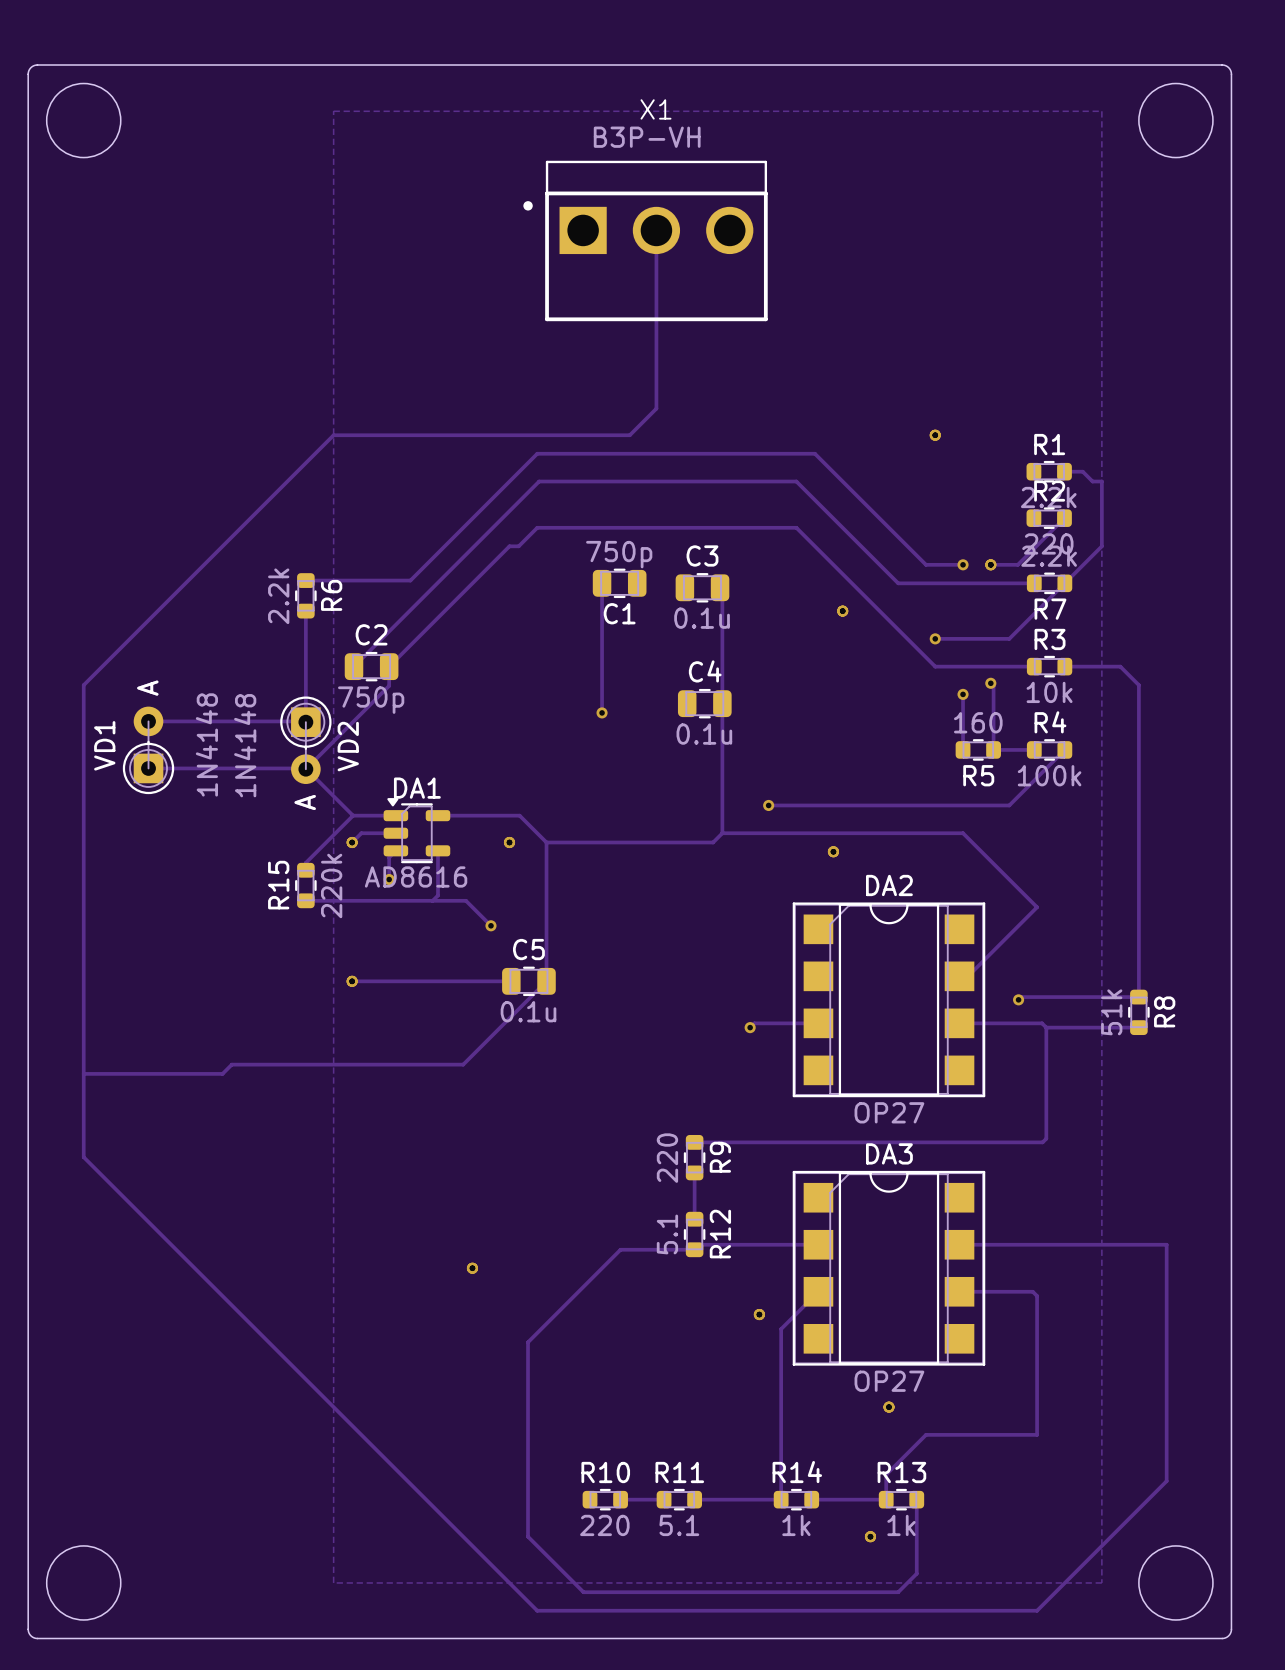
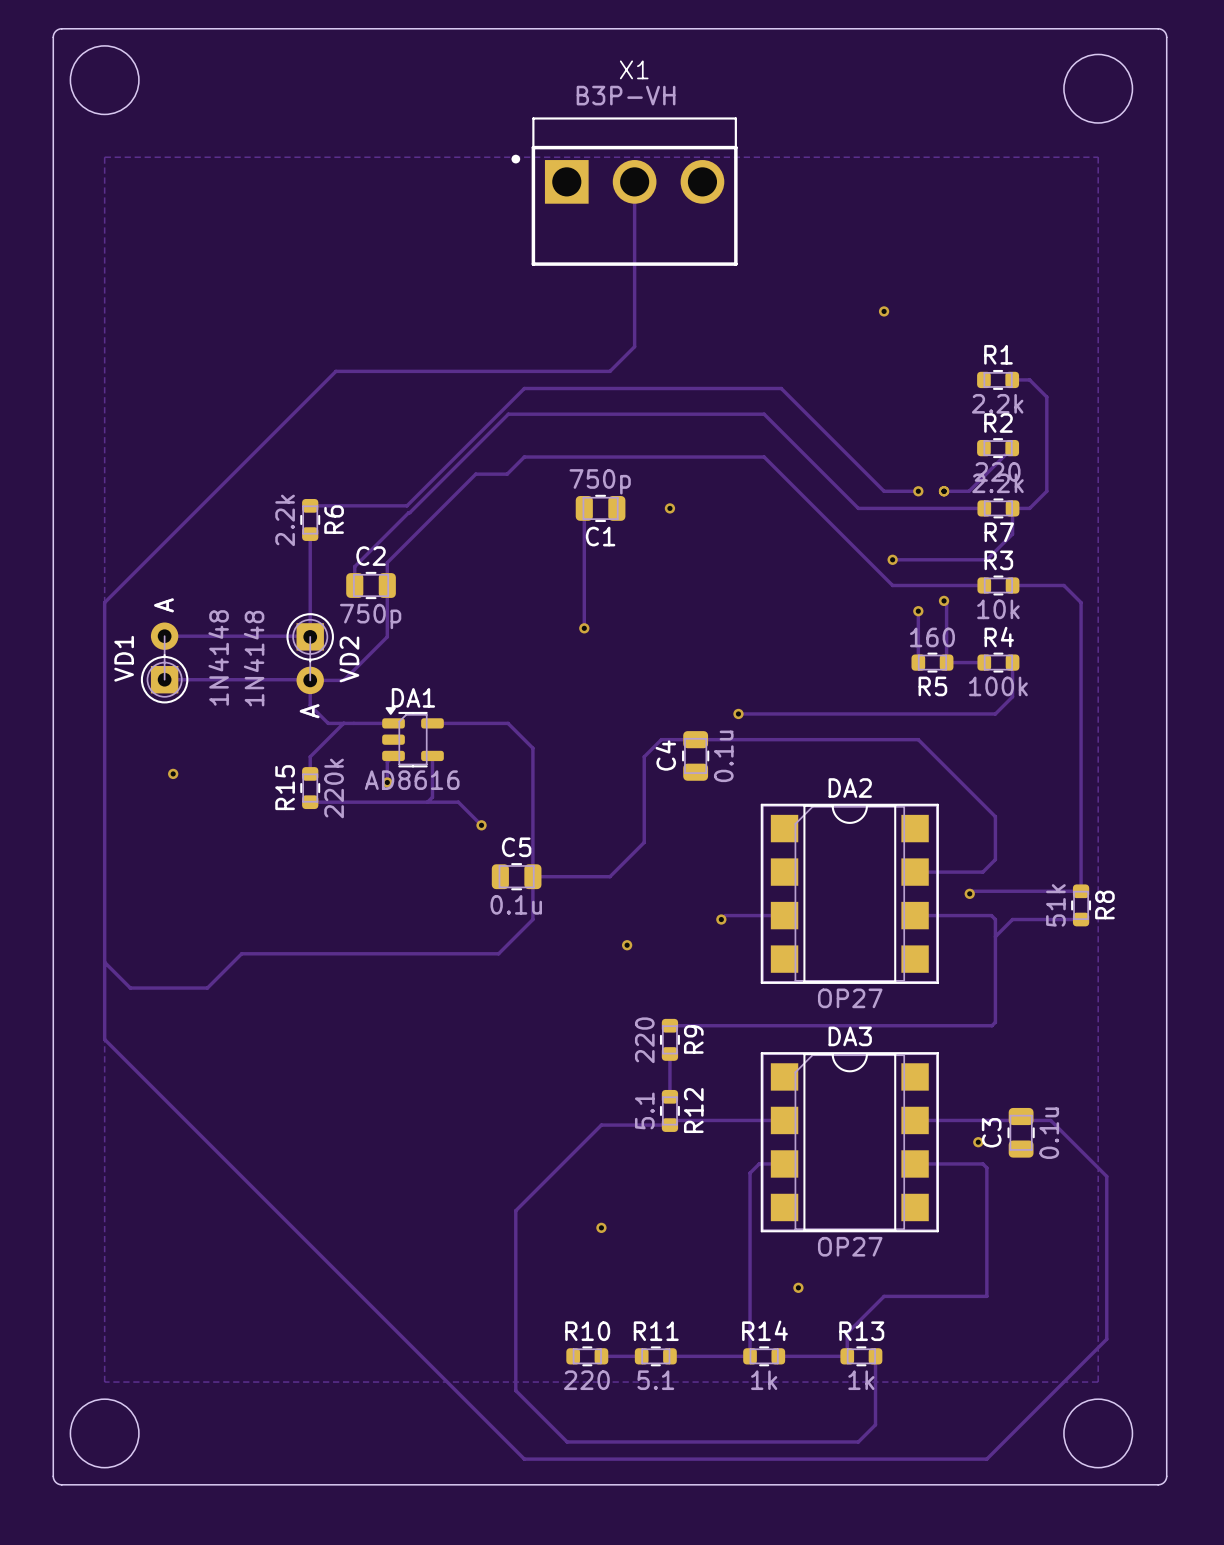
zone outline: (333, 111) (1101, 111) (1101, 1582) (333, 1582) (333, 111) -> (104, 157) (104, 1382) (1098, 1382) (1098, 157) (104, 157)
round board edge position: (1175, 120) -> (1098, 88)
via position: (935, 435) -> (884, 311)
R1 position: (1049, 471) -> (998, 379)
track: (1064, 471) (1082, 471) (1092, 481) (1101, 481) -> (1012, 379) (1029, 379) (1046, 397) (1046, 414)
track: (539, 481) (354, 666) -> (526, 414) (508, 414) (408, 512) (354, 566) (354, 585)
track: (509, 546) (389, 666) -> (498, 474) (475, 474) (387, 562) (387, 585)
track: (1101, 546) (1009, 638) -> (1046, 474) (1046, 491) (1029, 508) (1012, 508) (1012, 534) (986, 559) (961, 559)
C3 name position: C3 (702, 555) -> C3 (991, 1132)
via: none -> (669, 508)
C3 rotation: 0° (702, 587) -> 90° clockwise (1021, 1132)
C3 position: (702, 587) -> (1021, 1132)
track: (720, 587) (722, 590) (722, 833) (713, 842) (546, 842) -> none
via: (842, 611) -> none
C3 value position: 0.1u (702, 618) -> 0.1u (1049, 1133)
C4 name position: C4 (705, 671) -> C4 (665, 755)
track: (389, 685) (305, 769) -> (387, 603) (387, 636) (343, 680) (310, 680)
C4 rotation: 0° (704, 703) -> 90° clockwise (695, 755)
C4 position: (704, 703) -> (695, 755)
C4 value position: 0.1u (704, 734) -> 0.1u (723, 756)
track: (1064, 749) (1009, 805) -> (1012, 662) (1012, 696) (995, 713) (961, 713)
track: none -> (310, 680) (310, 705) (328, 723) (353, 723)
track: (306, 769) (353, 815) (305, 862) -> (343, 723) (310, 756) (310, 767)
track: (395, 833) (361, 833) (352, 842) -> none
via: (352, 842) -> none
via: (509, 842) -> none
via: (833, 851) -> none
via: none -> (173, 773)
track: (1037, 907) (968, 976) -> (986, 808) (995, 816) (995, 859) (982, 872) (922, 872)
track: (352, 981) (511, 981) -> none
via: (352, 981) -> none
track: (546, 981) (463, 1064) -> (695, 739) (661, 739) (644, 756) (644, 842) (609, 876) (532, 876) (532, 919) (498, 953) (455, 953)
track: (1046, 1027) (1064, 1027) -> (995, 936) (1012, 919)
via: none -> (627, 945)
track: (83, 1073) (222, 1073) -> (104, 962) (130, 988) (207, 988) (233, 962)
track: (1106, 1244) (1166, 1244) (1166, 1305) -> (1050, 1120) (1106, 1176)
via: (472, 1268) -> none
via: none -> (978, 1142)
track: (818, 1291) (781, 1329) -> (784, 1163) (759, 1163) (750, 1173) (750, 1198)
via: (759, 1314) -> none
via: none -> (601, 1227)
via: (888, 1407) -> none
via: none -> (798, 1287)
via: (870, 1536) -> none
round board edge position: (1175, 1582) -> (1098, 1433)

